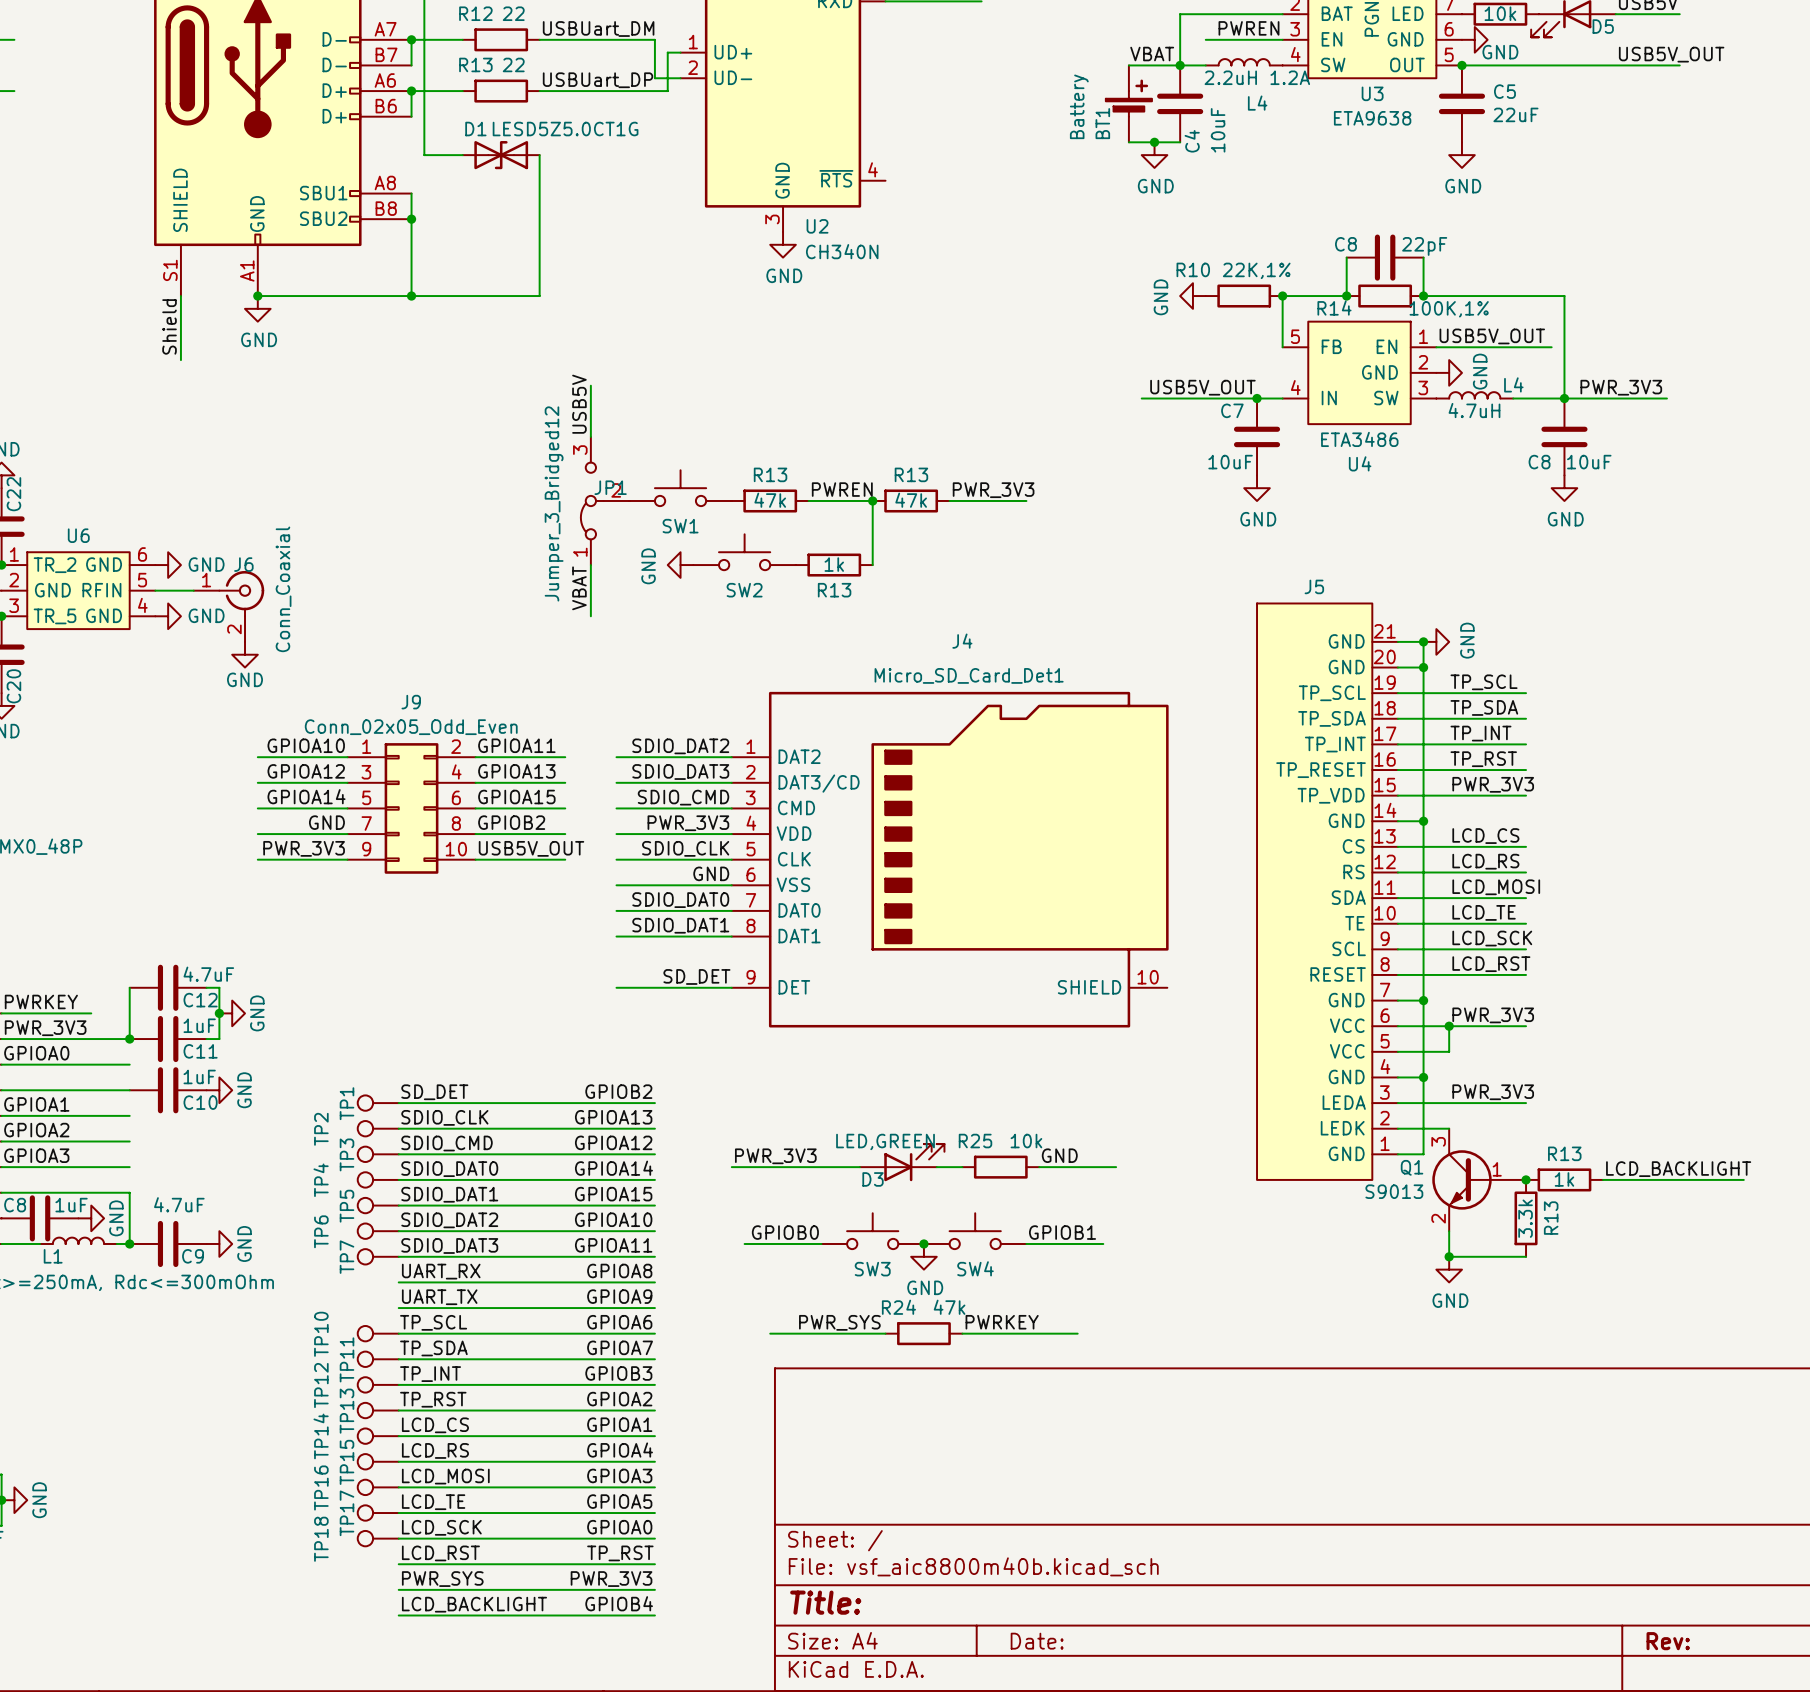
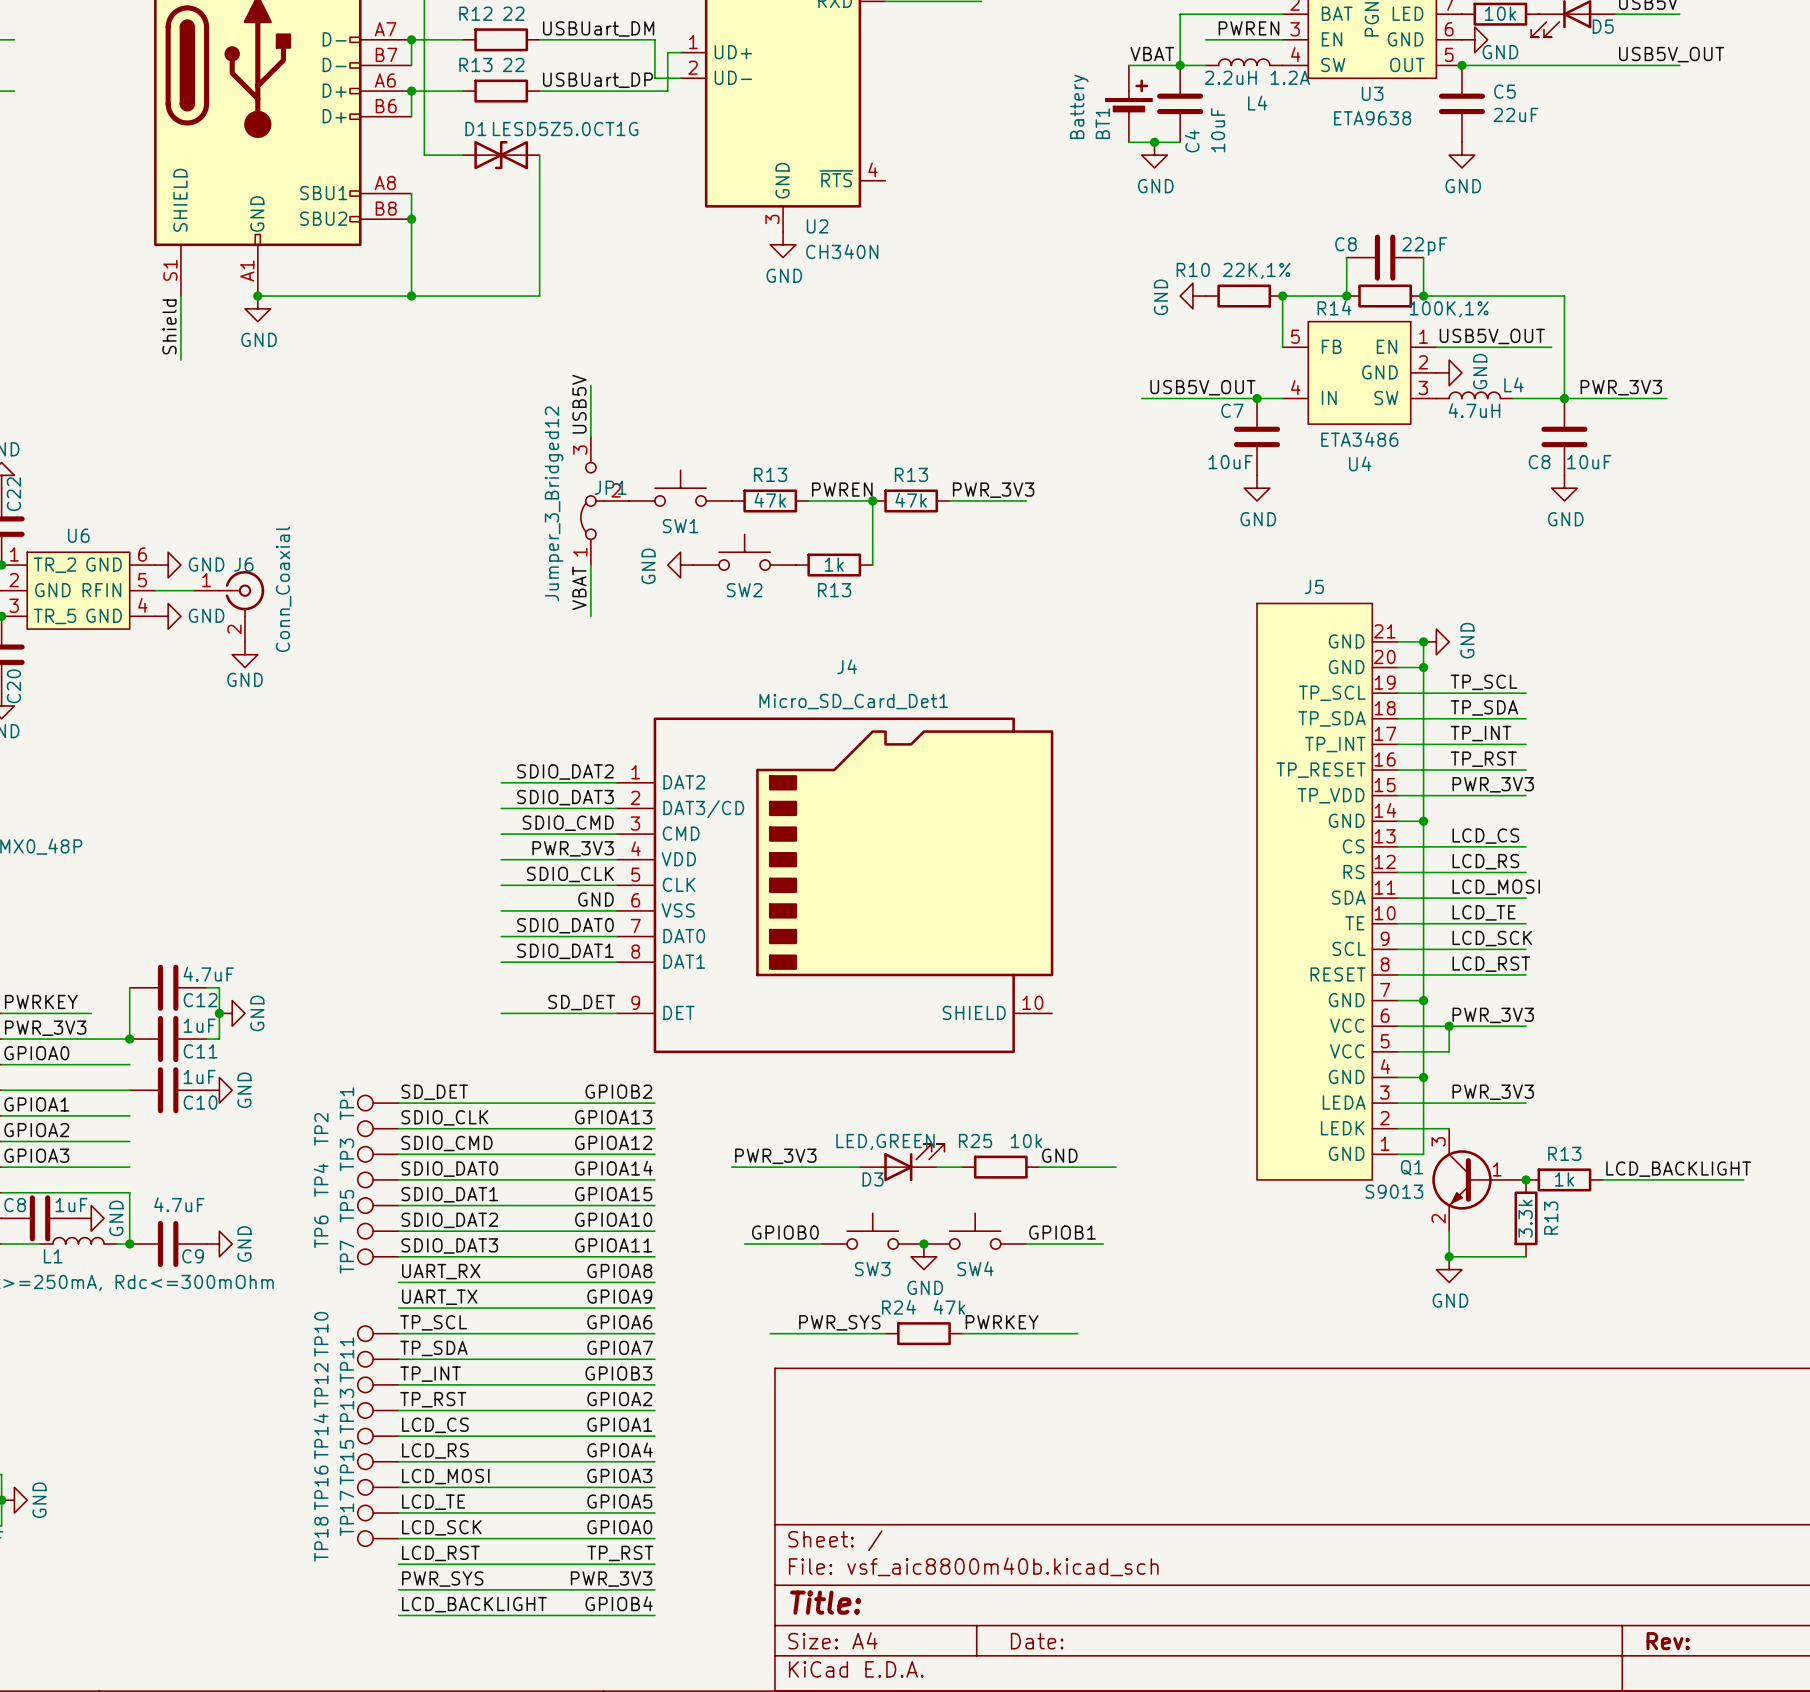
label: GPIOA10 (306, 745) -> none
label: GPIOA11 (516, 745) -> none
label position: SDIO_DAT2 (680, 746) -> SDIO_DAT2 (565, 772)
wire: (257, 757) (347, 757) -> none
wire: (475, 757) (565, 757) -> none
wire: (616, 757) (731, 757) -> (501, 962) (616, 962)
label: GPIOA12 (306, 771) -> none
label: GPIOA13 (516, 771) -> none
label position: SDIO_DAT3 (680, 772) -> SDIO_DAT3 (565, 797)
wire: (257, 782) (347, 782) -> none
wire: (475, 782) (501, 782) -> none
wire: (616, 782) (731, 782) -> (616, 782) (565, 782)
label: GPIOA14 (306, 796) -> none
label: GPIOA15 (516, 797) -> none
label position: SDIO_CMD (683, 797) -> SDIO_CMD (568, 823)
wire: (257, 808) (347, 808) -> none
J9: Conn_02x05_Odd_Even (411, 808) -> none
wire: (475, 808) (501, 808) -> none
wire: (616, 808) (731, 808) -> (616, 808) (565, 808)
label: GND (326, 822) -> none
label: GPIOB2 (511, 822) -> none
label position: PWR_3V3 (688, 823) -> PWR_3V3 (573, 848)
wire: (257, 834) (347, 834) -> none
wire: (475, 834) (501, 834) -> none
wire: (616, 834) (731, 834) -> (616, 834) (565, 834)
label: PWR_3V3 (304, 848) -> none
label: USB5V_OUT (531, 848) -> none
label position: SDIO_CLK (685, 848) -> SDIO_CLK (570, 874)
wire: (257, 859) (347, 859) -> none
wire: (475, 859) (501, 859) -> none
wire: (616, 859) (731, 859) -> (616, 859) (565, 859)
J4 position: (950, 859) -> (834, 885)
label position: GND (711, 873) -> GND (595, 899)
wire: (616, 885) (731, 885) -> (616, 885) (501, 885)
label position: SDIO_DAT0 (680, 900) -> SDIO_DAT0 (565, 925)
wire: (616, 910) (731, 910) -> (616, 910) (501, 910)
label position: SDIO_DAT1 (680, 925) -> SDIO_DAT1 (565, 951)
wire: (616, 936) (731, 936) -> (616, 936) (501, 936)
label position: SD_DET (696, 976) -> SD_DET (581, 1002)
wire: (616, 987) (731, 987) -> (501, 1013) (616, 1013)

